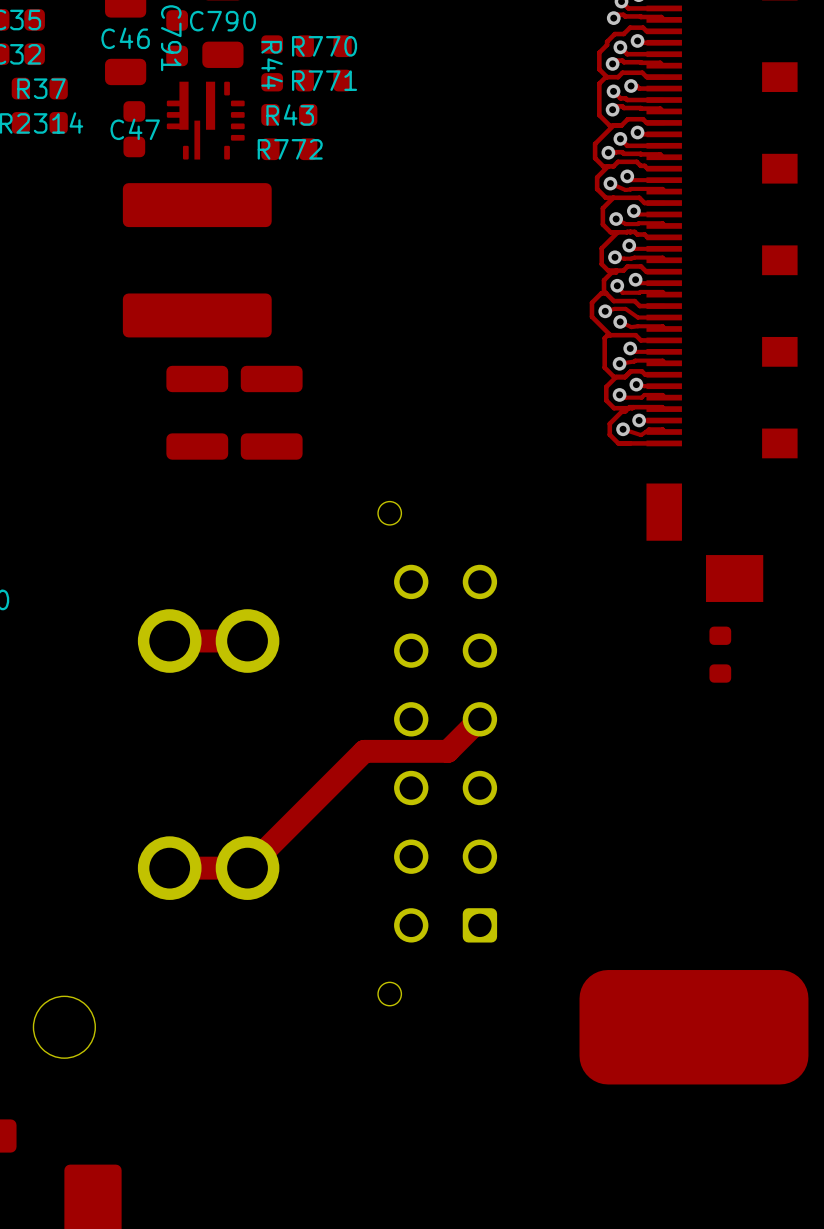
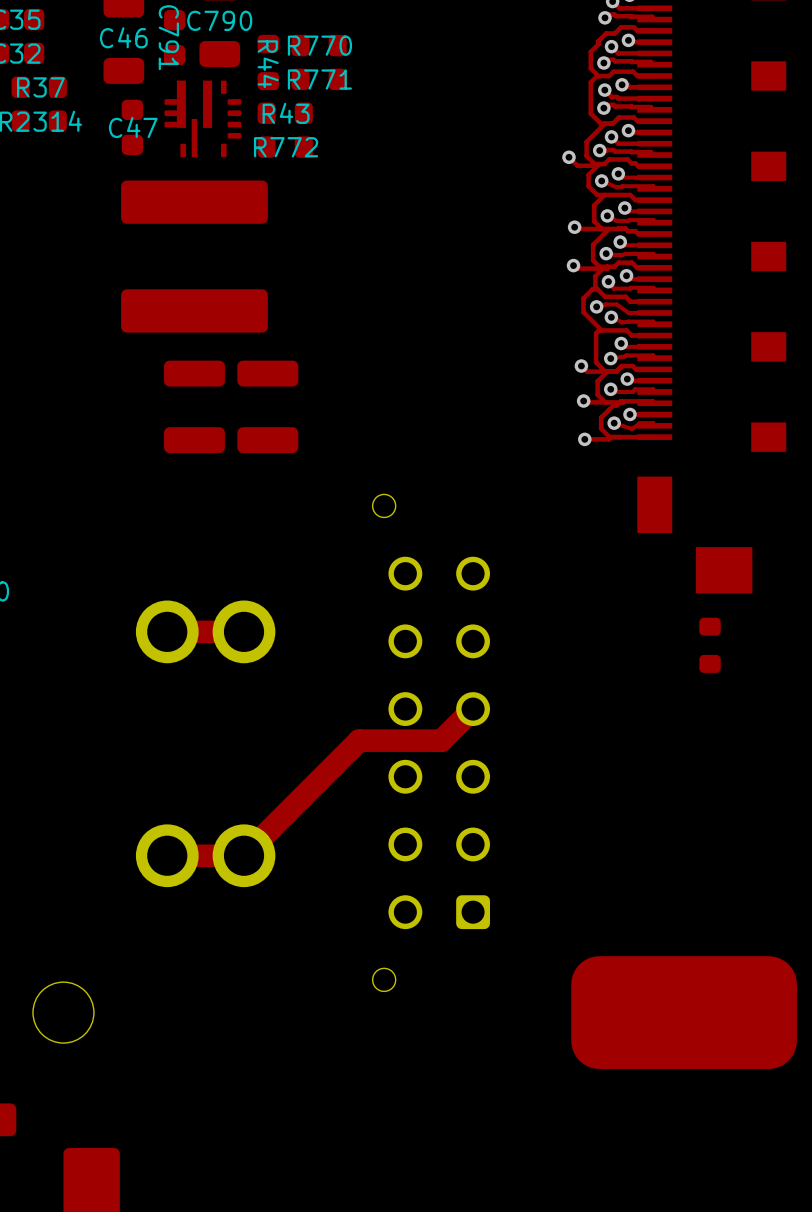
top track: none -> (568, 157) (577, 165) (597, 165)
via: none -> (568, 157)
top track: none -> (574, 227) (576, 228) (601, 228)
via: none -> (574, 227)
top track: none -> (573, 265) (576, 268) (603, 268)
via: none -> (573, 265)
top track: none -> (581, 366) (587, 371) (605, 371)
via: none -> (581, 366)
top track: none -> (583, 401) (605, 402)
via: none -> (583, 401)
top track: none -> (610, 437) (608, 439) (584, 439)
via: none -> (584, 439)

